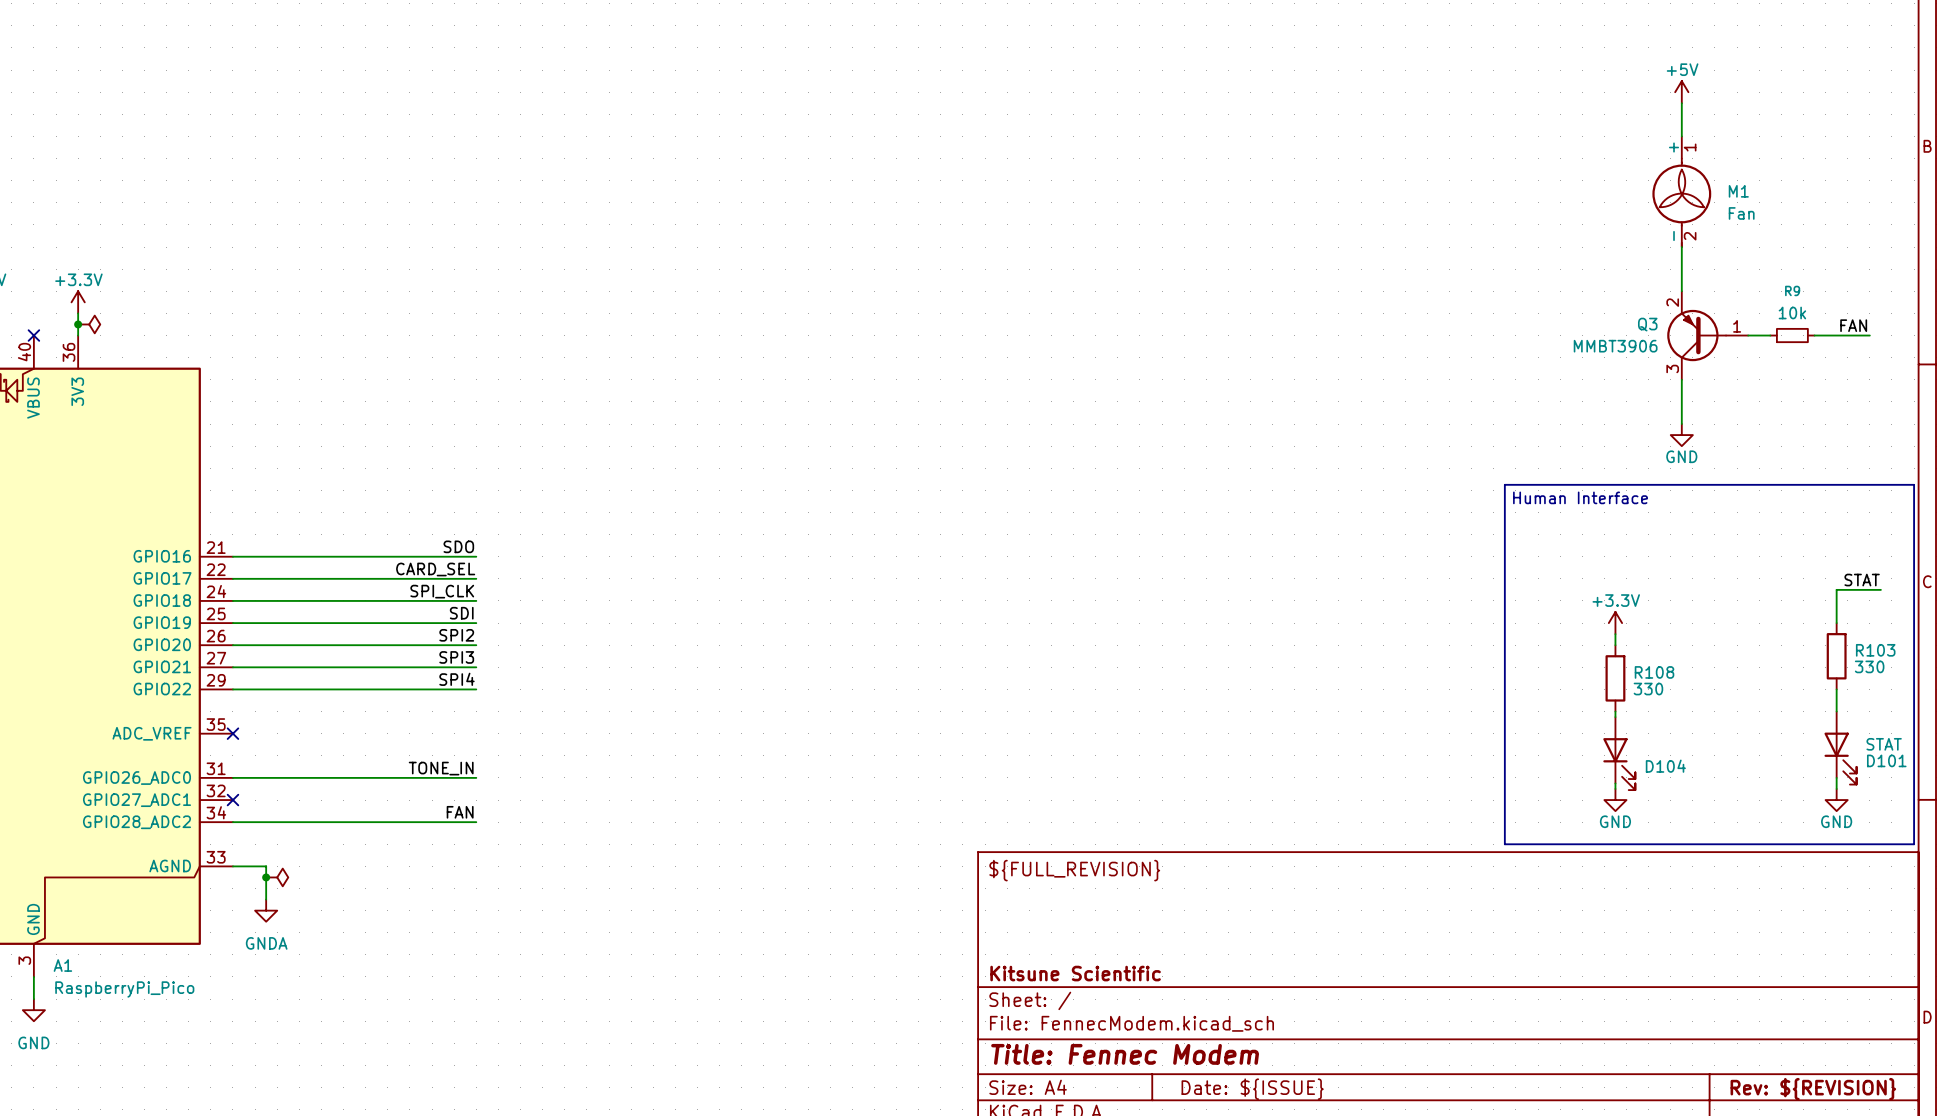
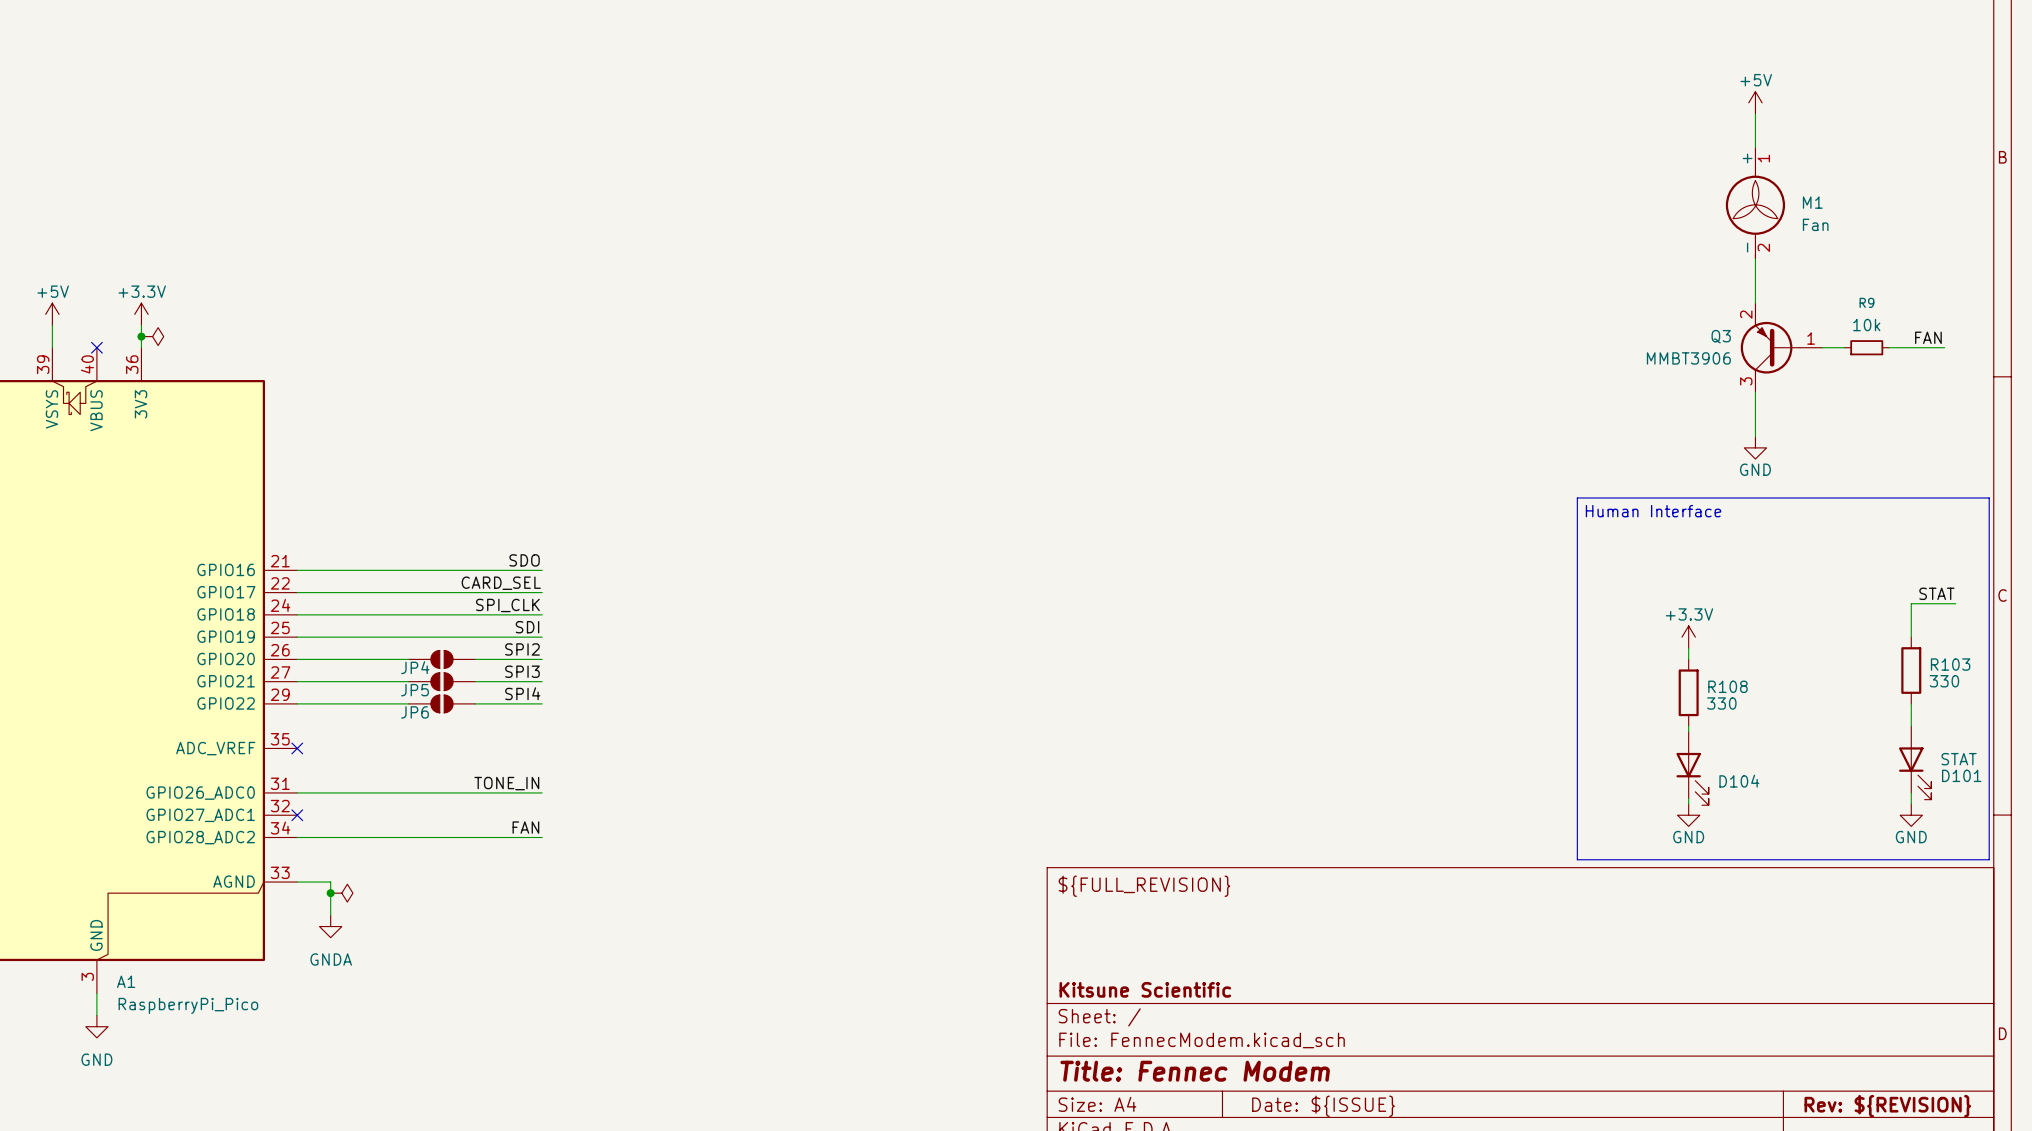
JP4: none -> (441, 659)
JP5: none -> (441, 681)
JP6: none -> (441, 703)

